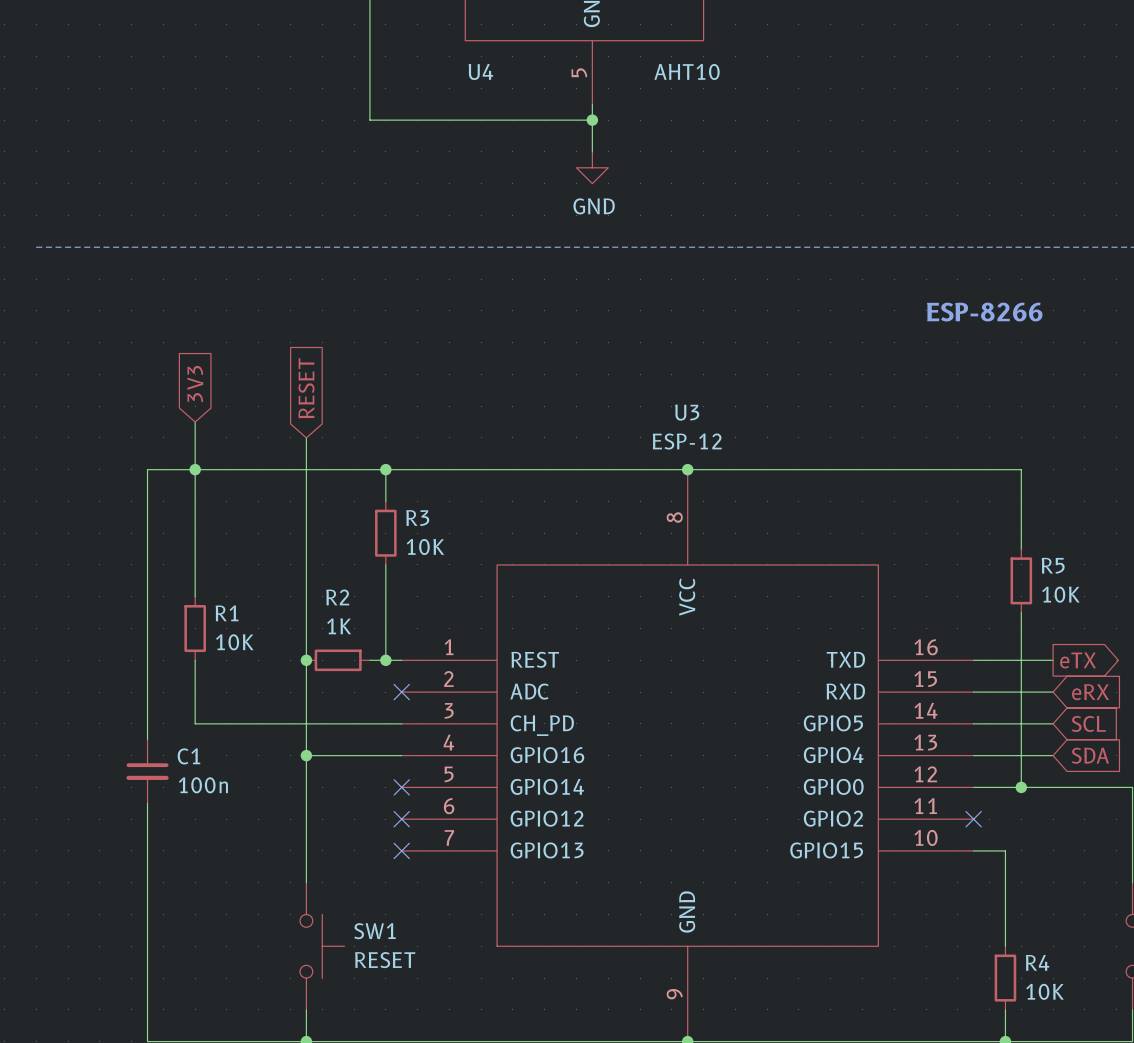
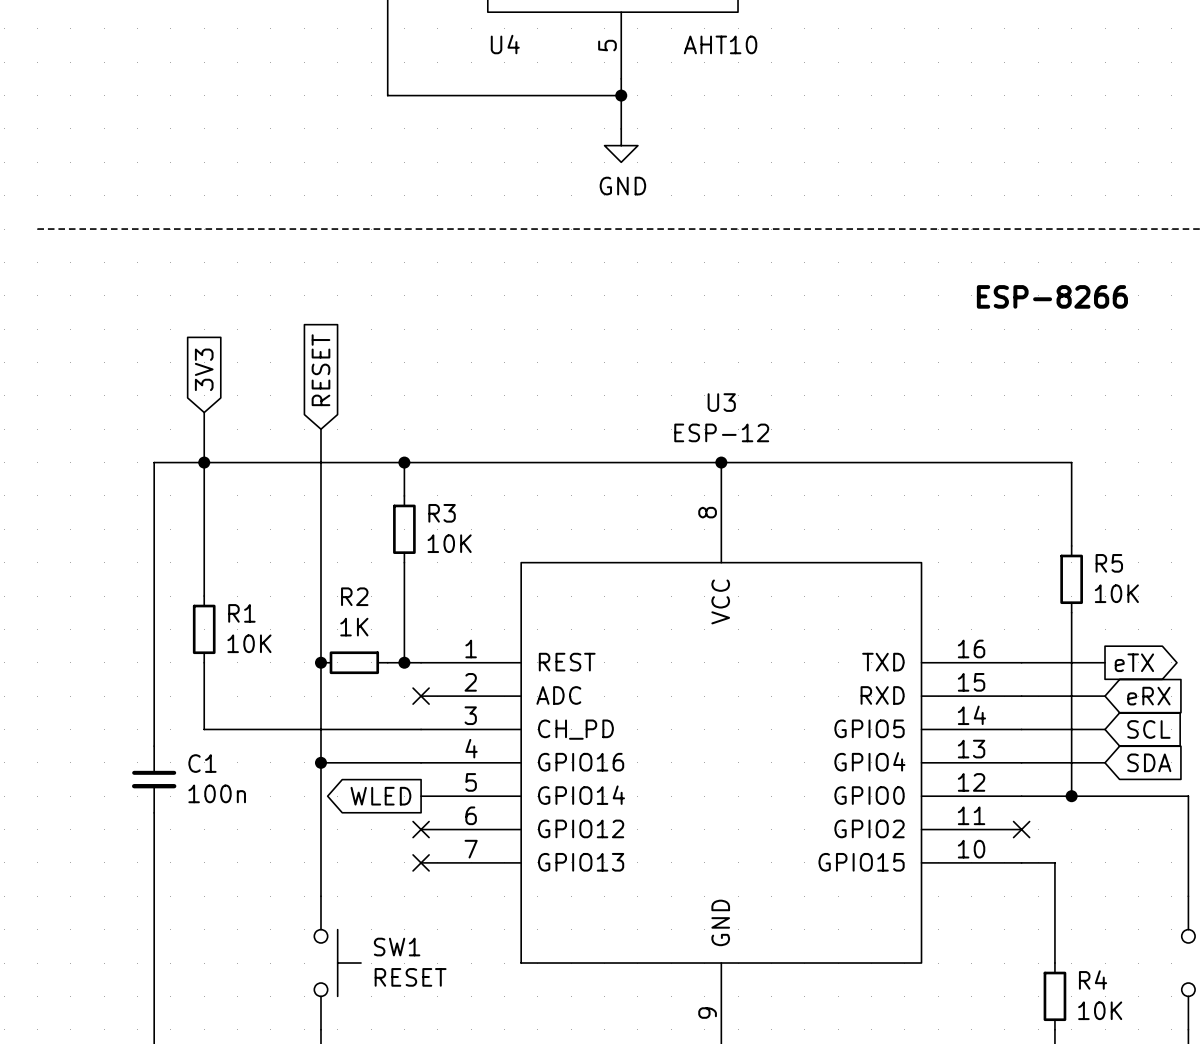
global label: none -> WLED (380, 796)
no-connect mark: (401, 787) -> none

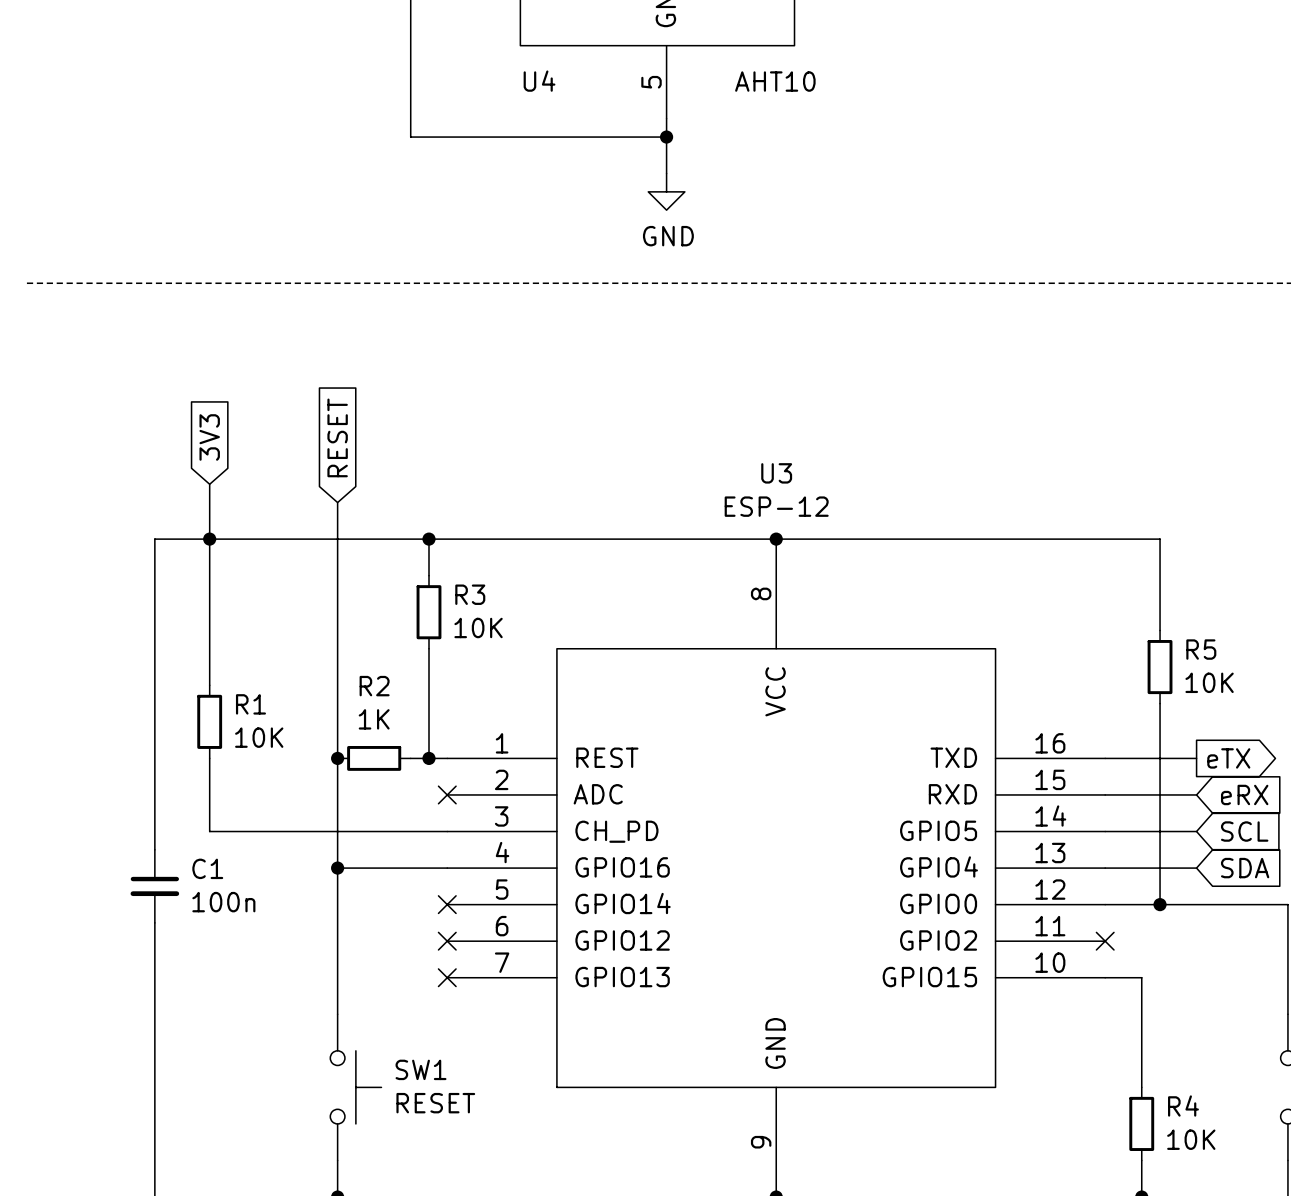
text: ESP-8266 (1052, 296) -> none
global label: WLED (380, 796) -> none
no-connect mark: none -> (447, 904)

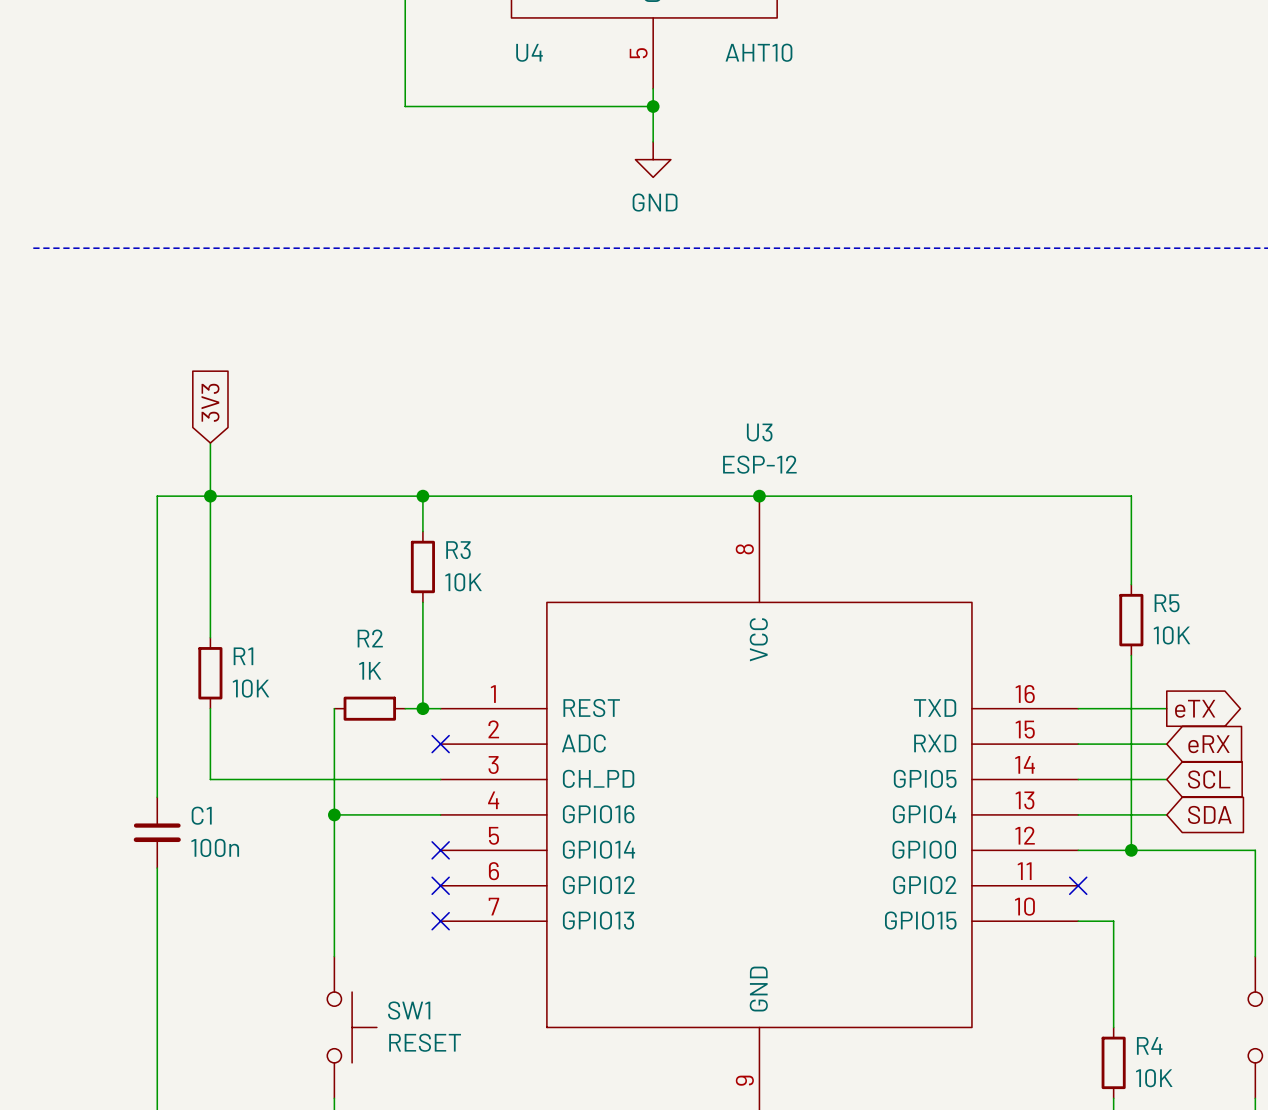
global label: RESET (337, 437) -> none
wire: (337, 502) (337, 758) -> none
junction: (337, 758) -> none

